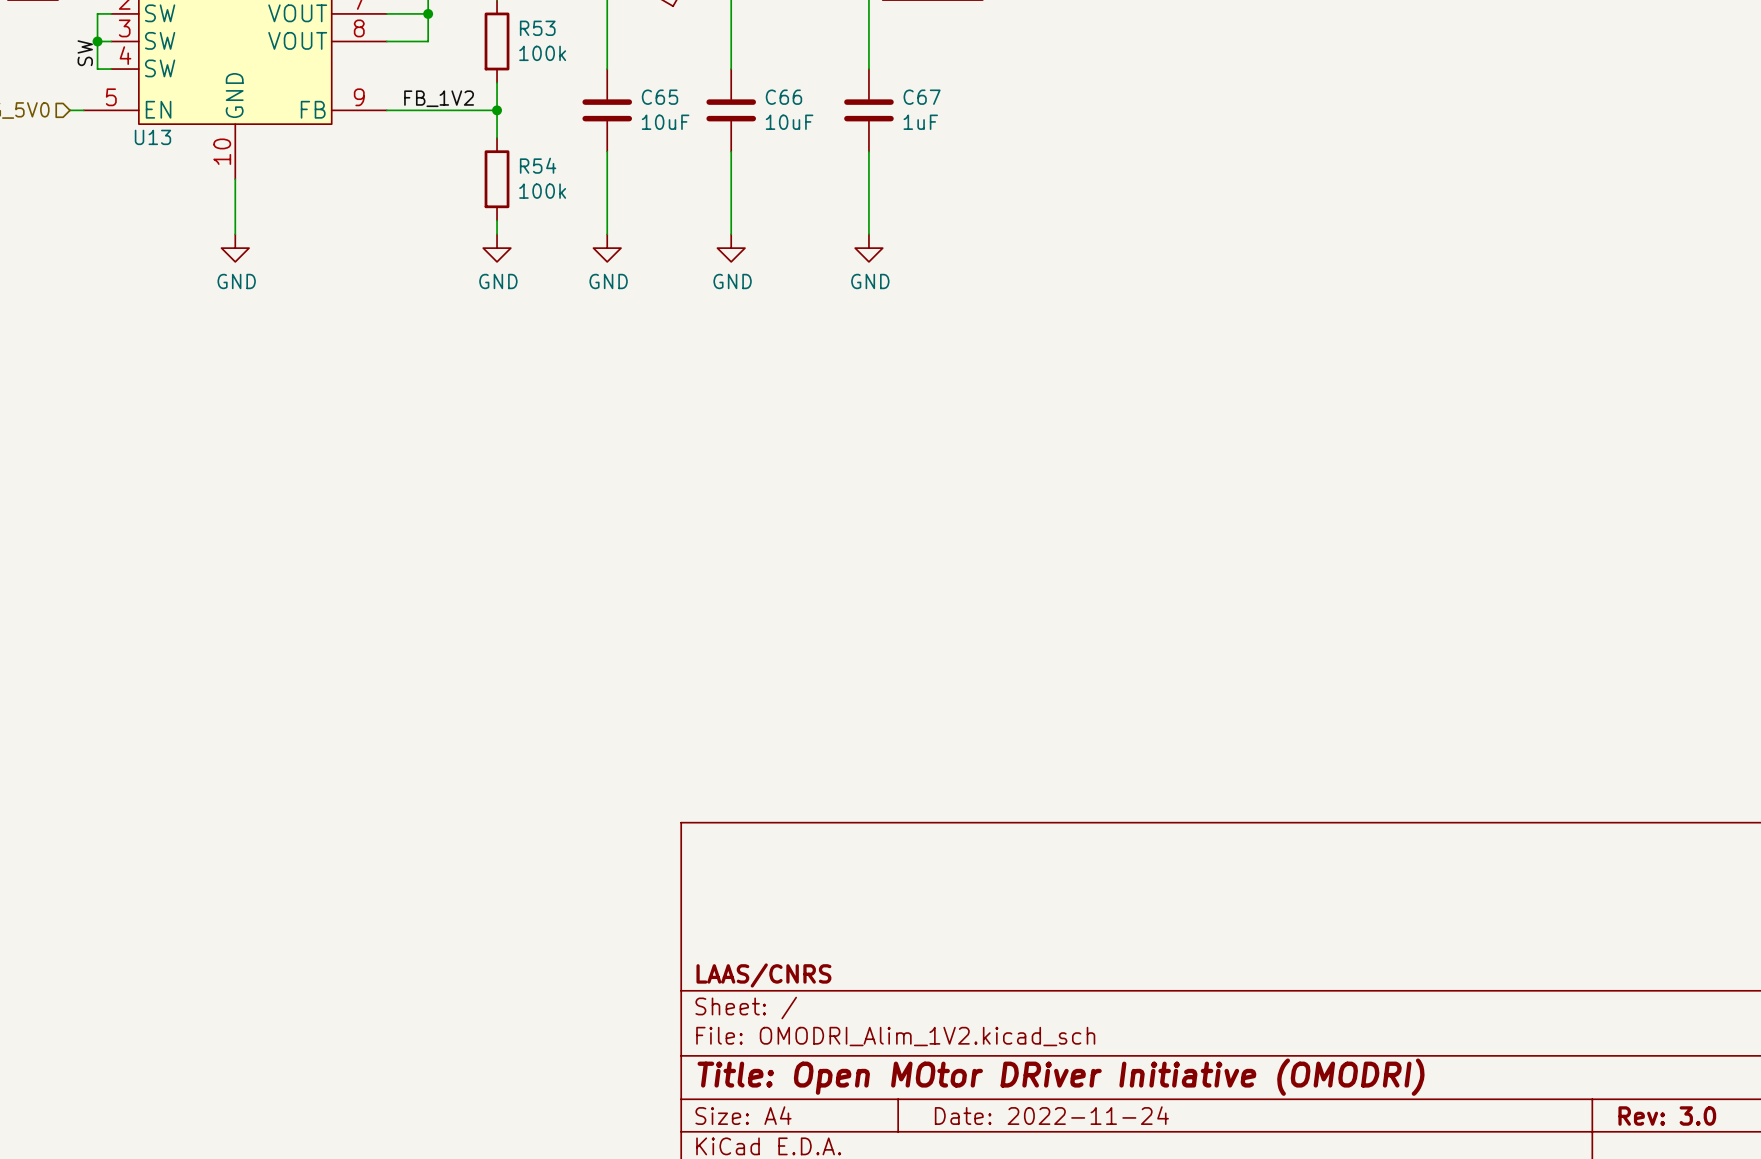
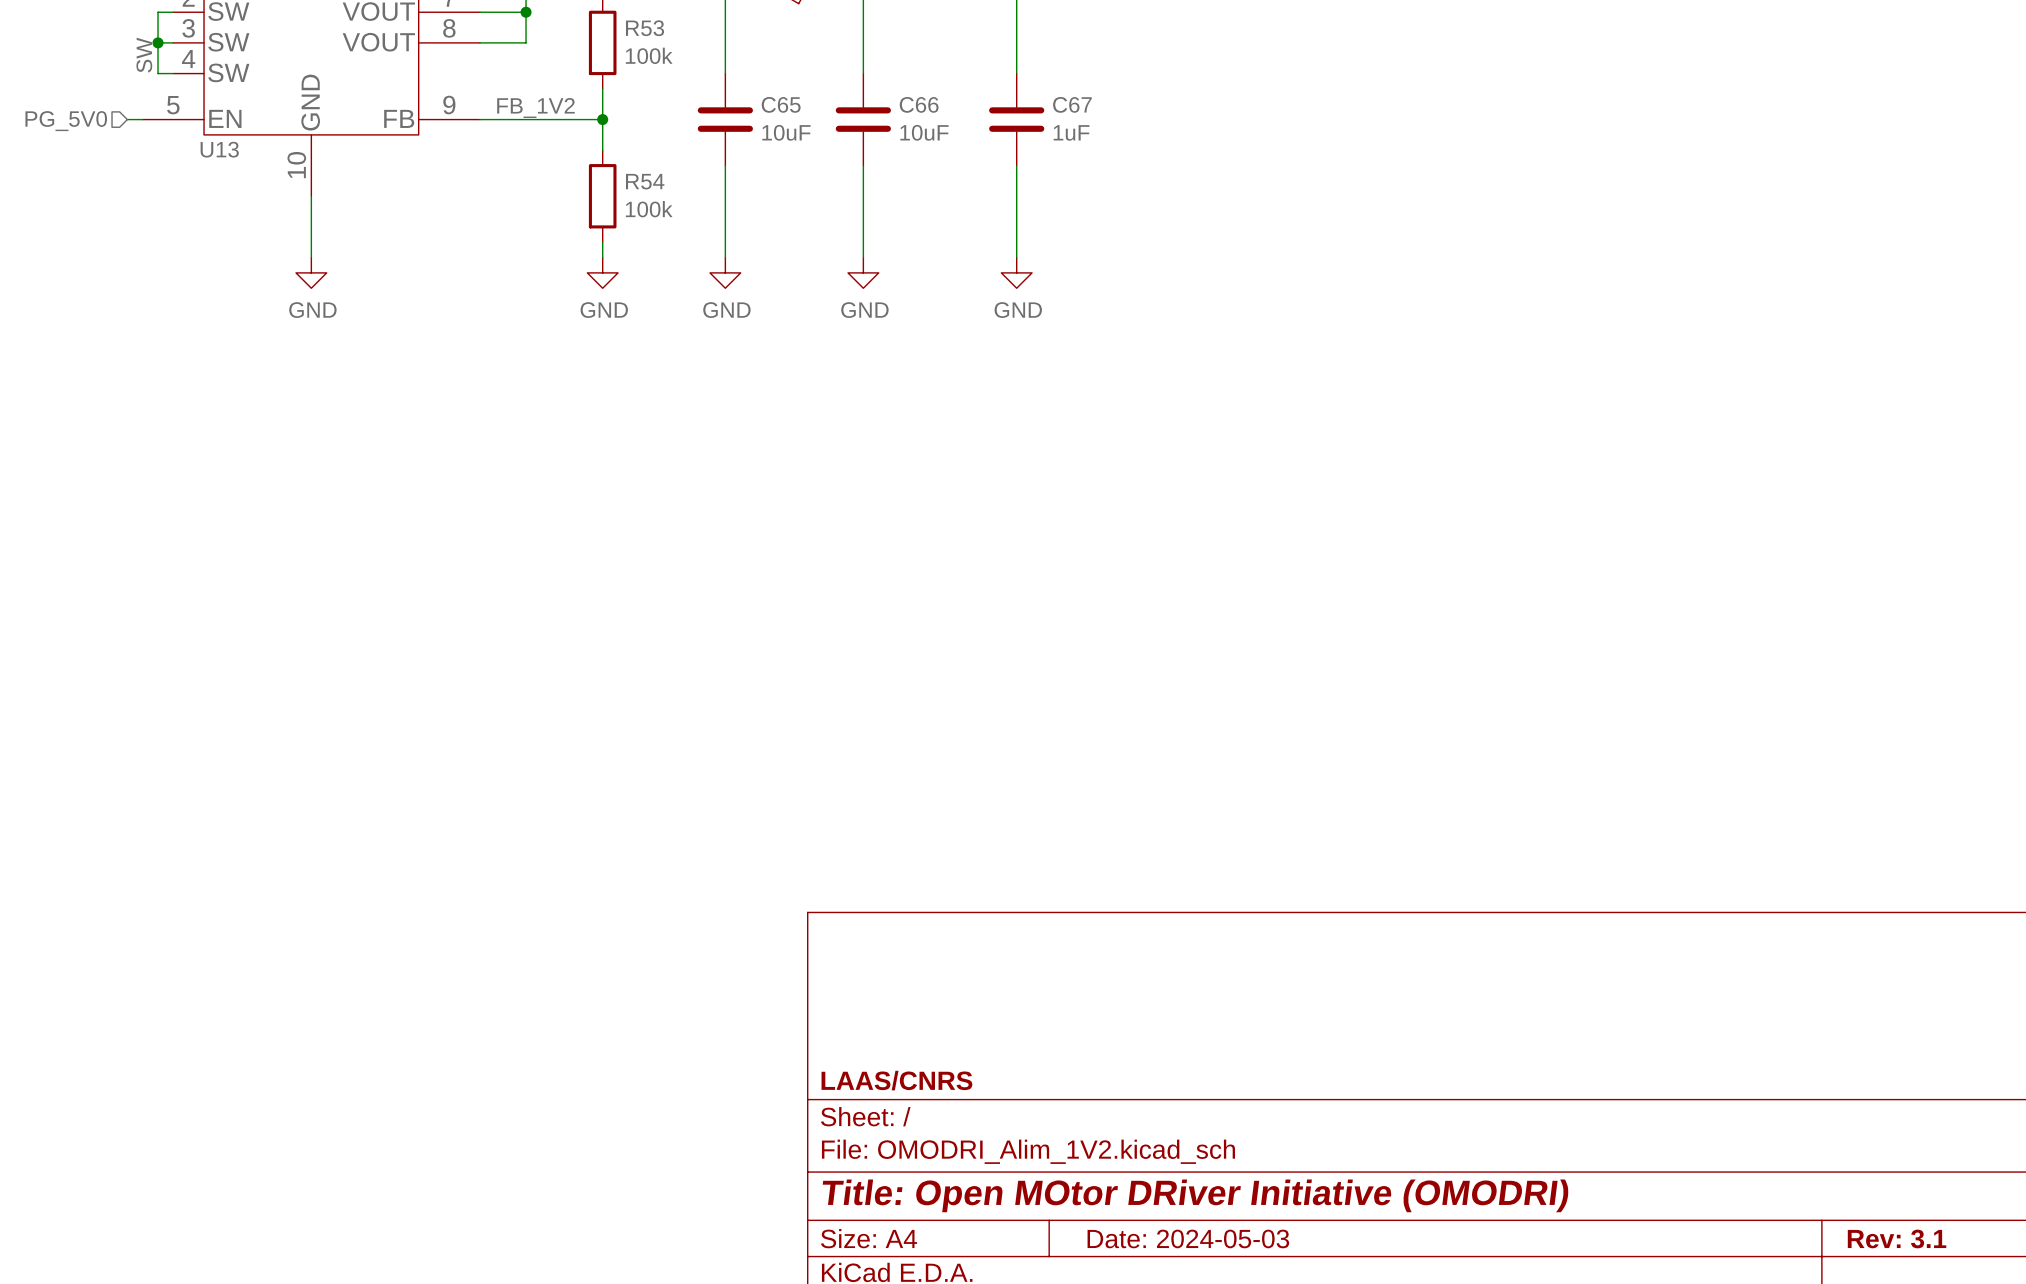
title block: Date: 2022-11-24 (1051, 1115) -> Date: 2024-05-03 (1188, 1238)
title block: Rev: 3.0 (1667, 1116) -> Rev: 3.1 (1897, 1238)

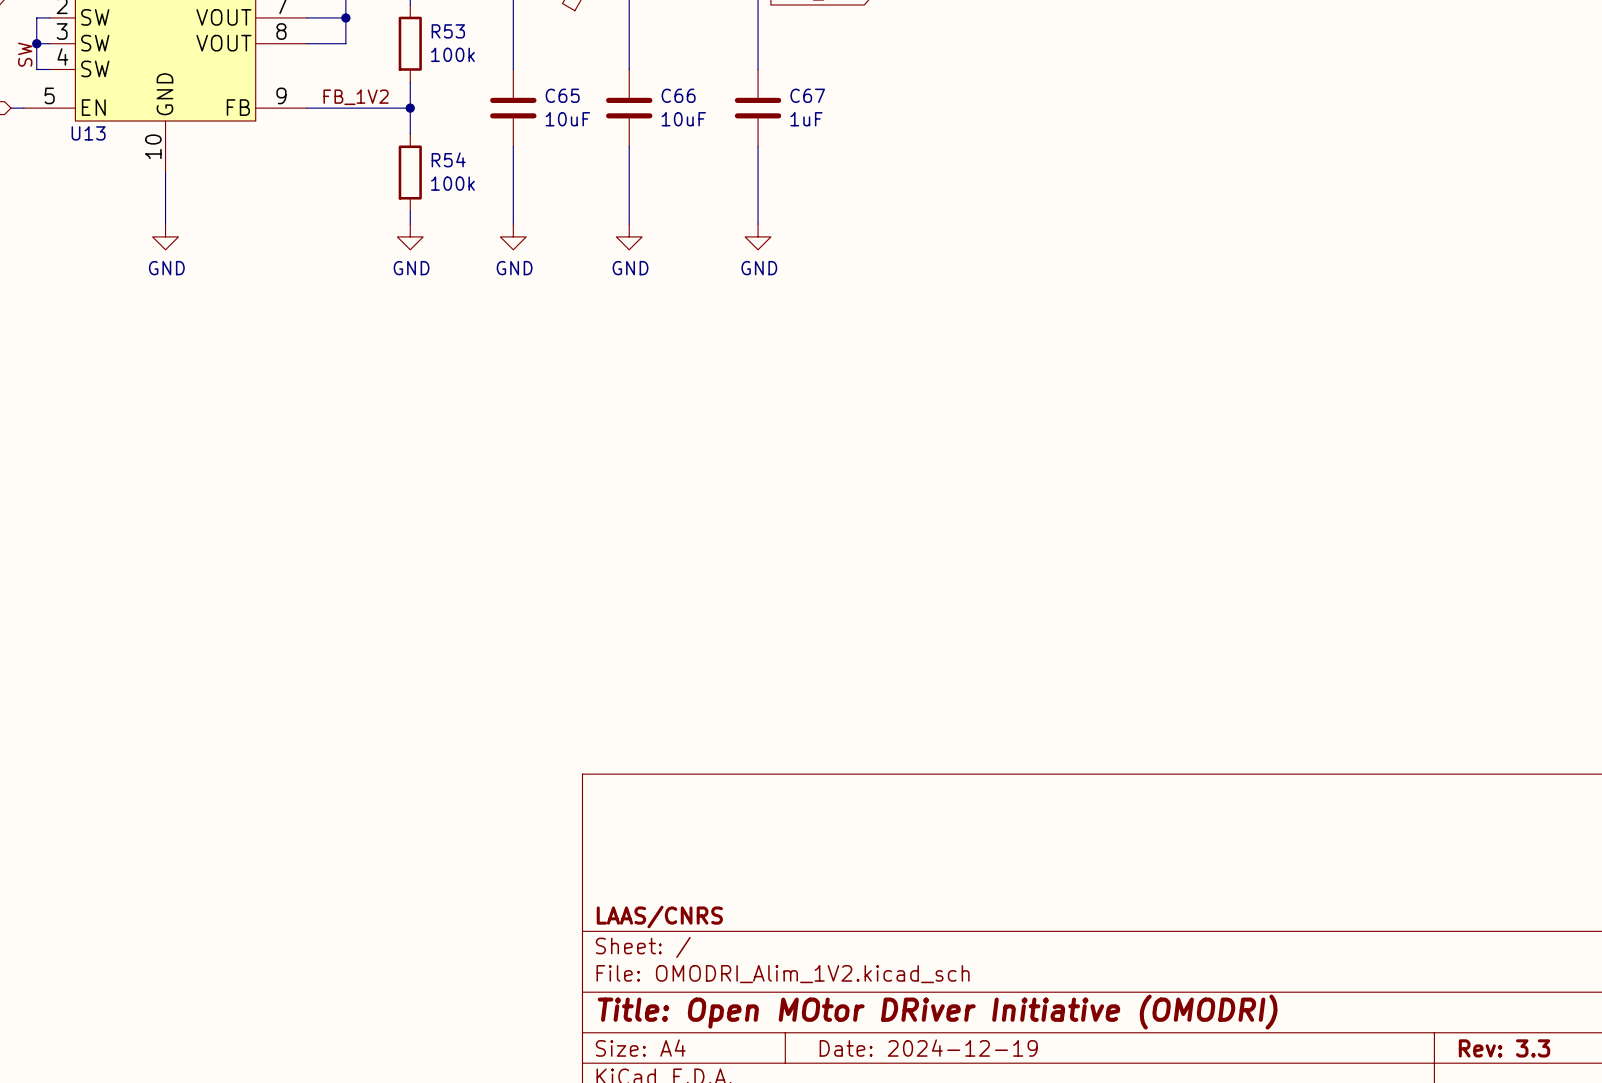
title block: Date: 2024-05-03 (1188, 1238) -> Date: 2024-12-19 (928, 1048)
title block: Rev: 3.1 (1897, 1238) -> Rev: 3.3 (1504, 1048)

